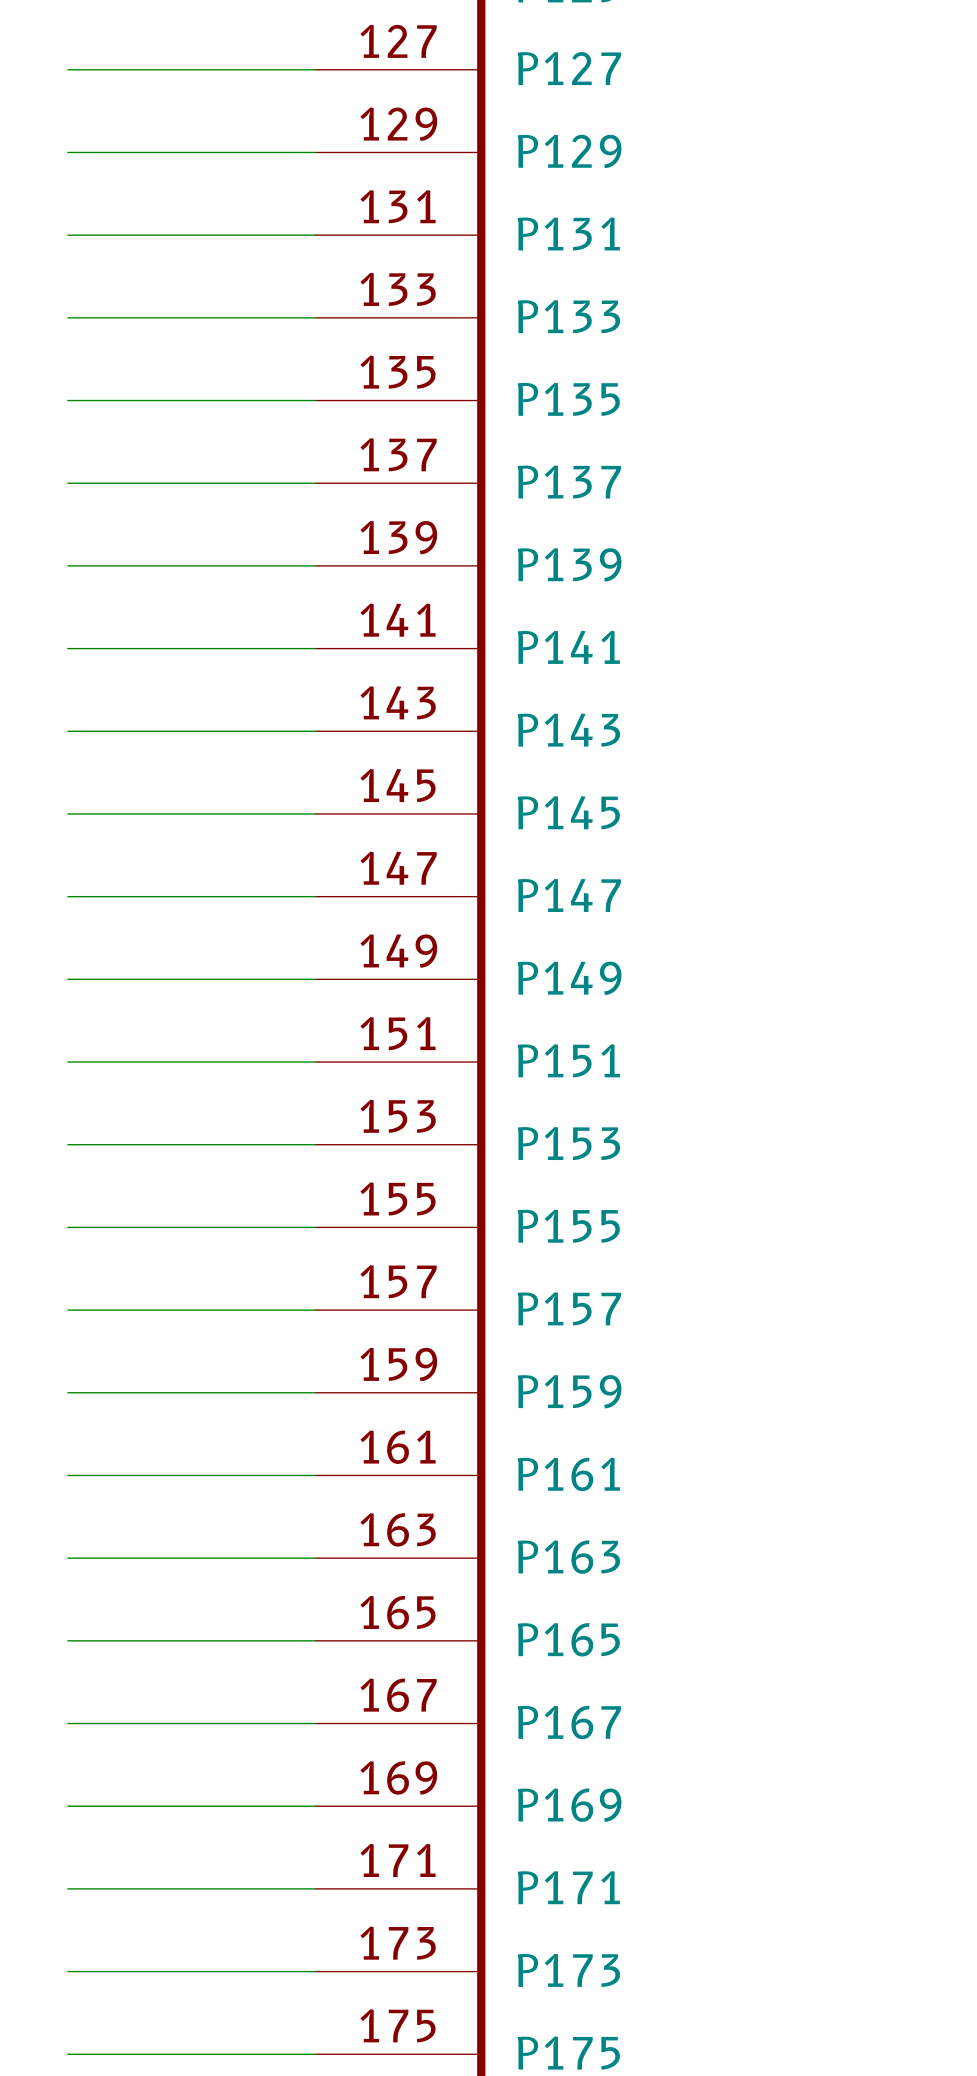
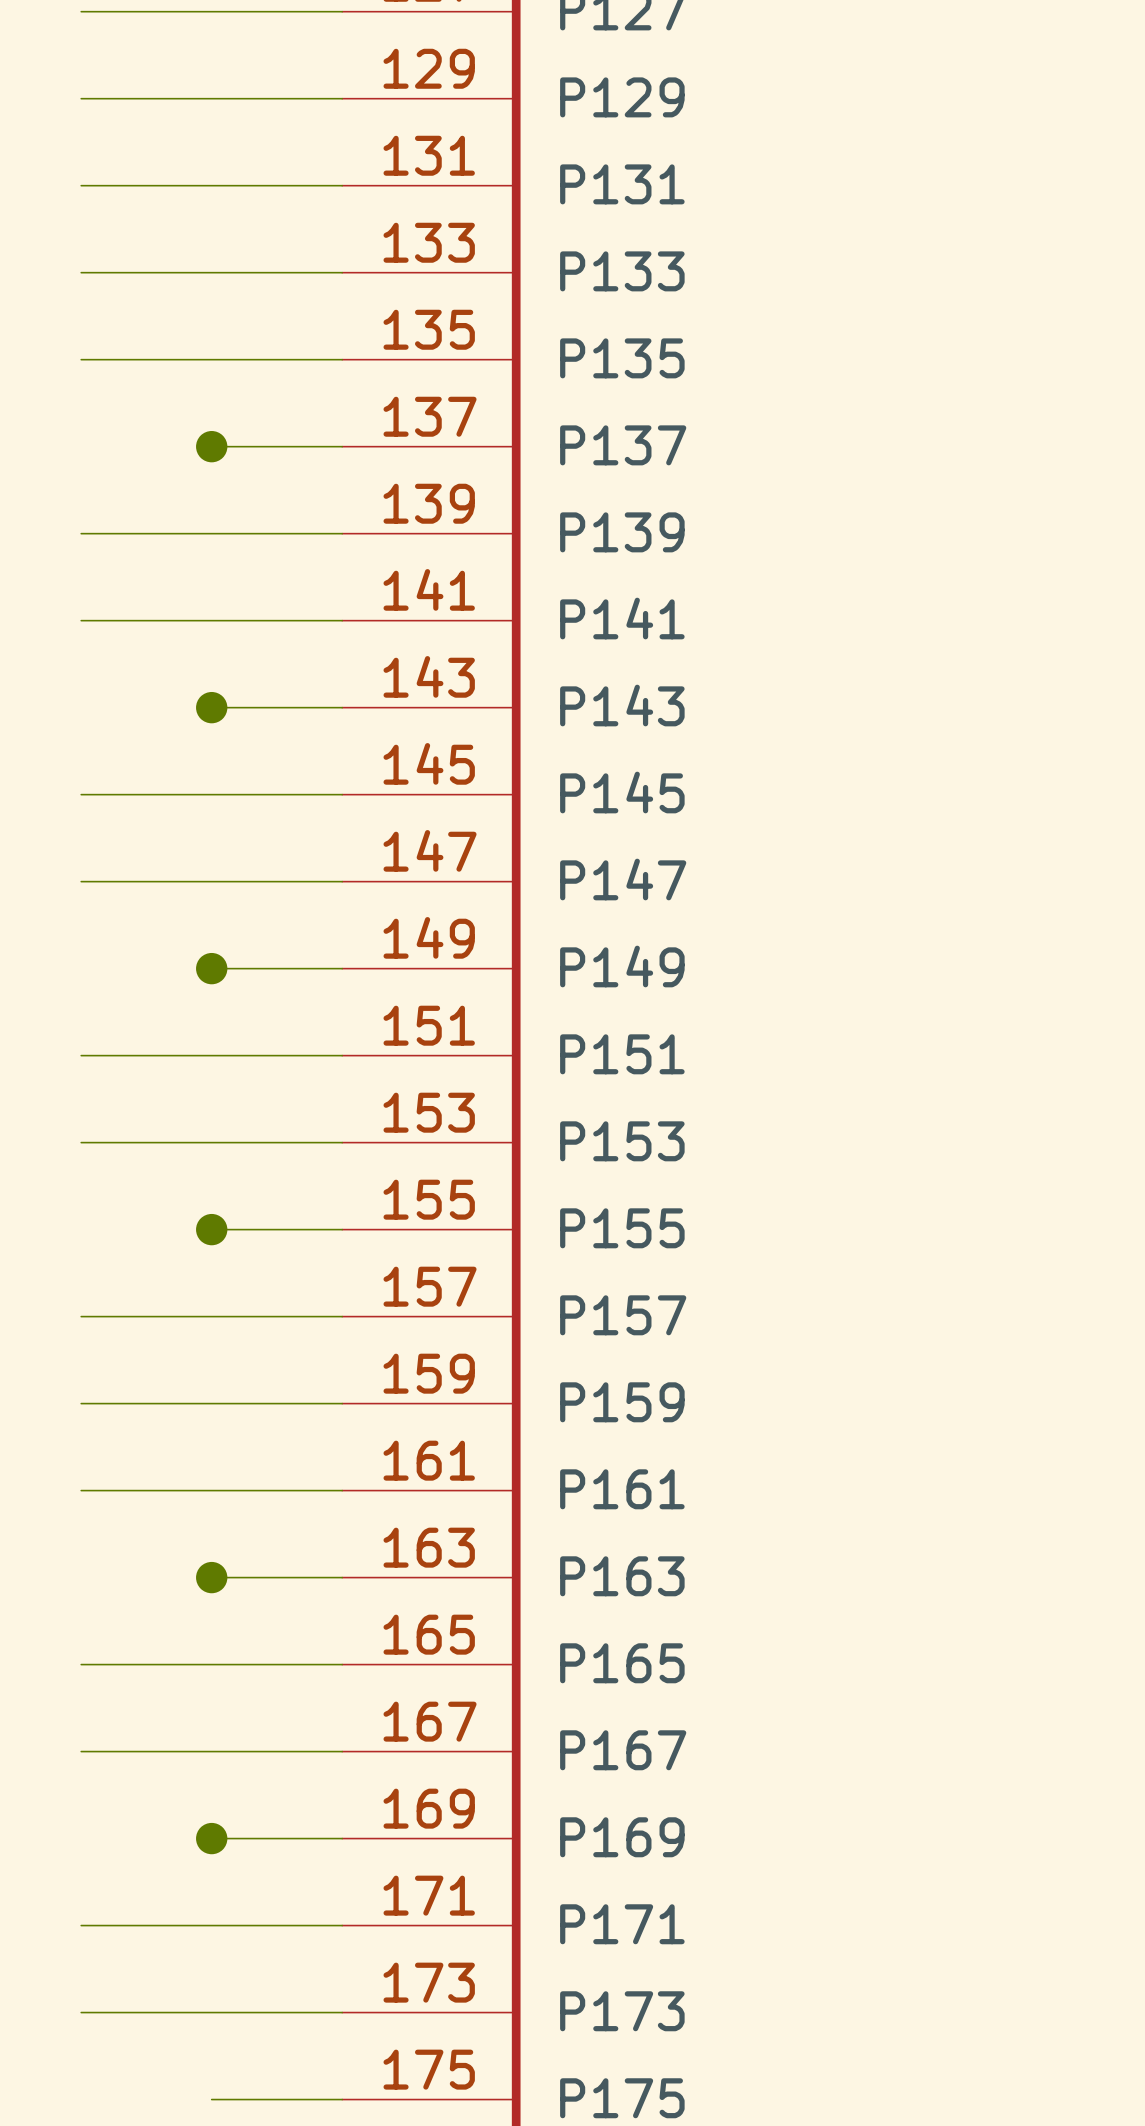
wire: (67, 483) (191, 483) -> none
junction: none -> (211, 446)
wire: (67, 731) (191, 731) -> none
junction: none -> (211, 707)
wire: (67, 979) (191, 979) -> none
junction: none -> (211, 968)
wire: (67, 1227) (191, 1227) -> none
junction: none -> (211, 1229)
wire: (67, 1558) (191, 1558) -> none
junction: none -> (211, 1577)
wire: (67, 1806) (191, 1806) -> none
junction: none -> (211, 1838)
wire: (67, 2054) (191, 2054) -> none

